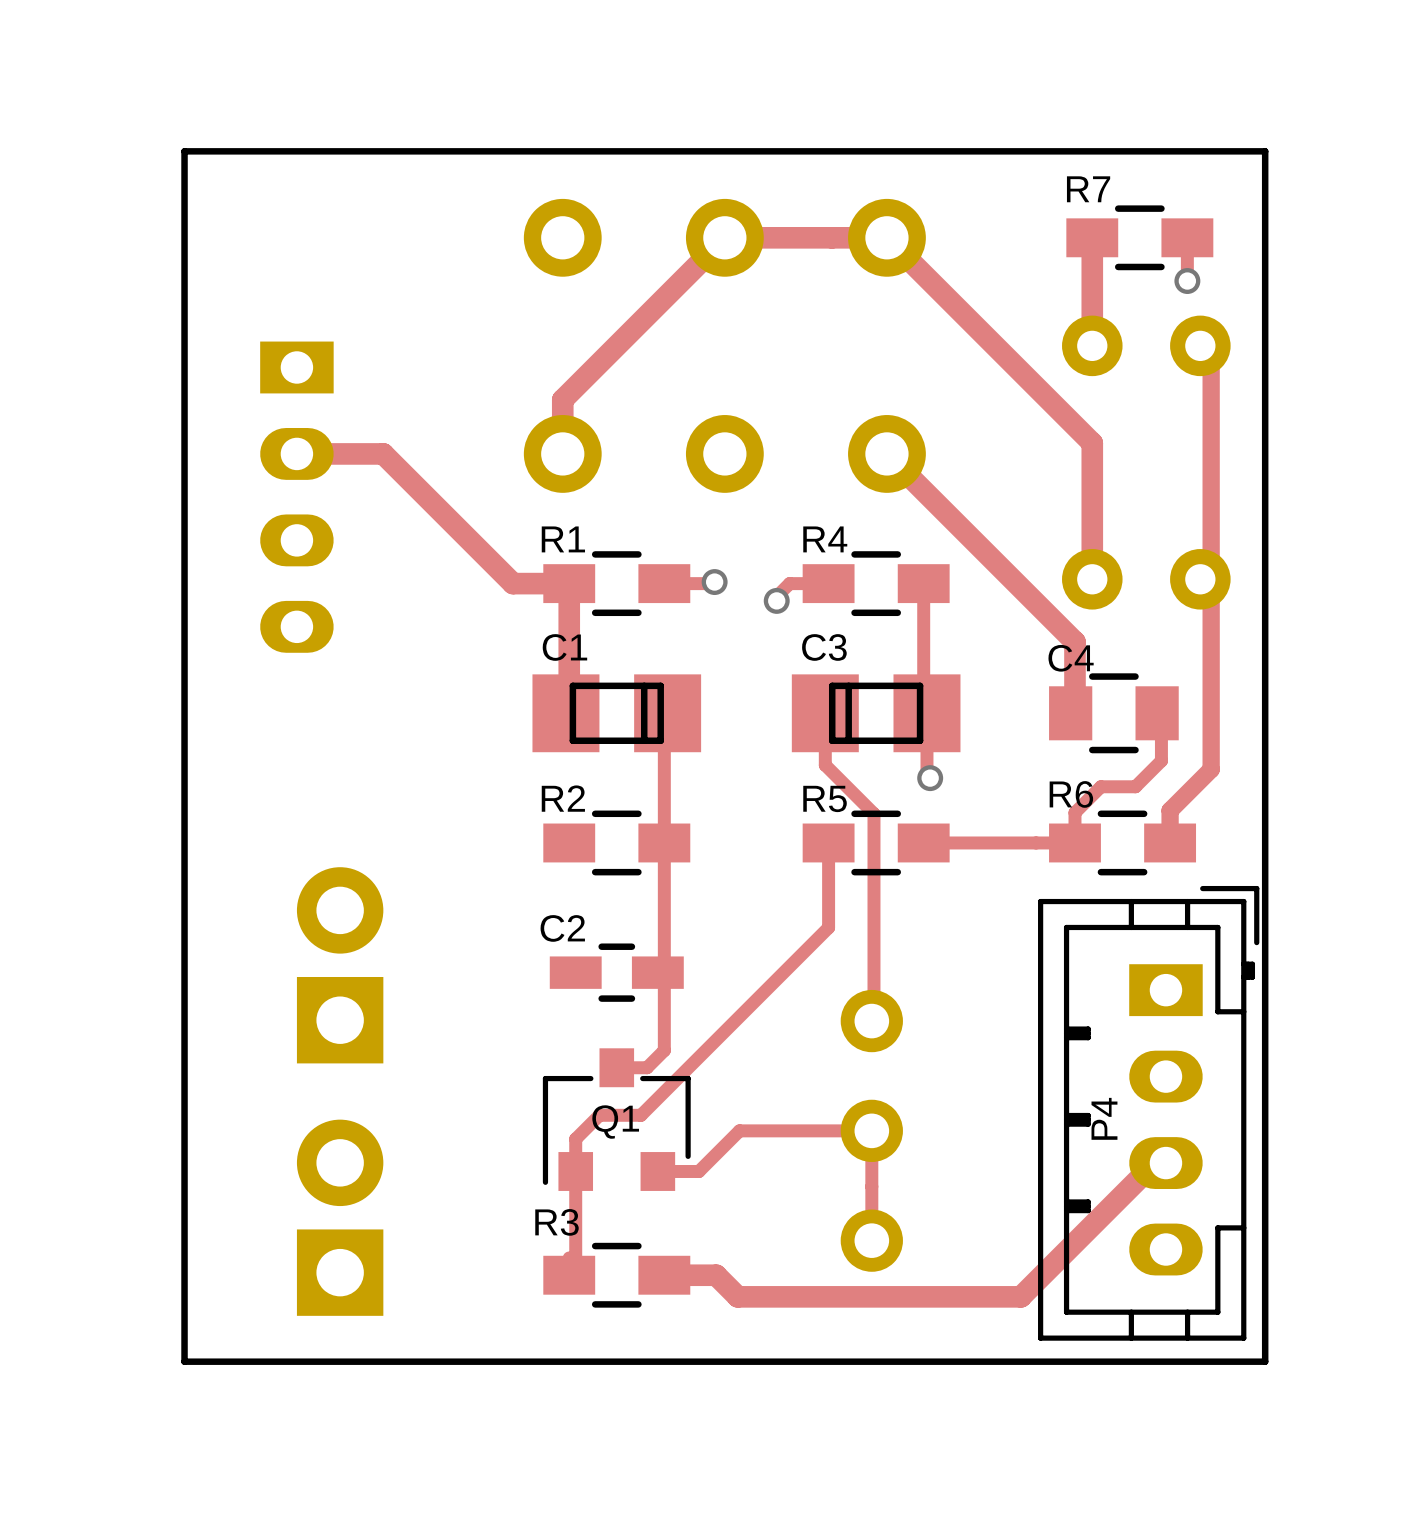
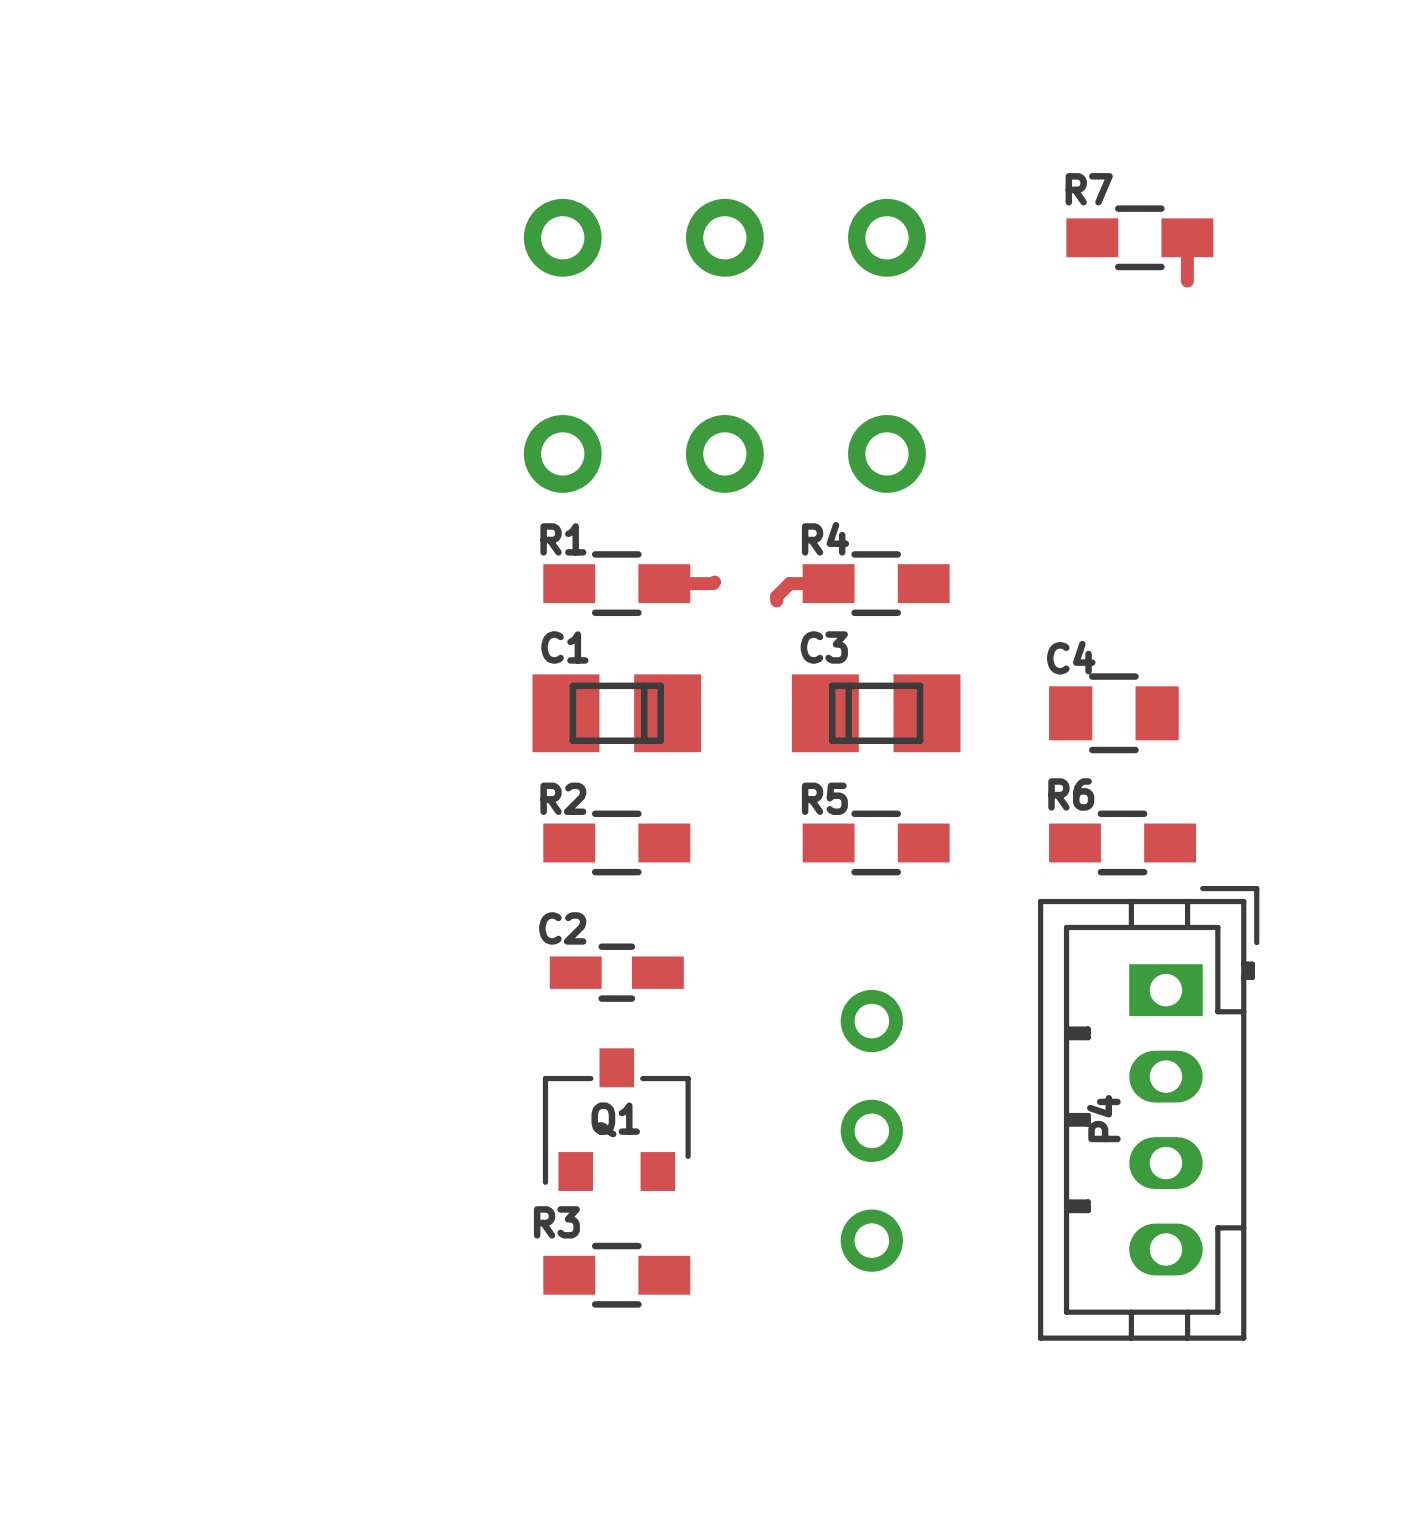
board edge: (184, 151) (184, 1361) (1265, 1361) (1265, 151) (184, 151) -> none
track: (1092, 237) (1092, 345) -> none
via: (1187, 281) -> none
part: (1146, 345) -> none
track: (1200, 345) (1211, 356) (1211, 568) (1204, 574) -> none
track: (296, 453) (383, 453) (513, 583) (569, 583) (569, 710) (565, 713) -> none
track: (562, 453) (562, 399) (724, 237) (886, 237) (1092, 443) (1092, 579) -> none
track: (886, 453) (1074, 641) (1074, 717) -> none
part: (296, 497) -> none
part: (1146, 579) -> none
via: (714, 582) -> none
track: (923, 583) (923, 710) (926, 713) (926, 774) (930, 778) -> none
track: (1204, 583) (1211, 590) (1211, 769) (1170, 810) (1170, 842) -> none
via: (776, 600) -> none
track: (667, 713) (664, 716) (664, 966) (657, 972) (664, 979) (664, 1050) (647, 1067) (616, 1067) -> none
track: (825, 713) (825, 765) (873, 813) (873, 1018) -> none
track: (1161, 717) (1161, 760) (1135, 786) (1100, 786) (1074, 812) (1074, 842) (1066, 834) -> none
via: (930, 778) -> none
track: (923, 842) (1081, 842) -> none
track: (819, 851) (828, 842) (828, 927) (640, 1115) (599, 1115) (575, 1139) (575, 1268) (569, 1275) (569, 1257) -> none
part: (340, 965) -> none
track: (1165, 1162) (1154, 1162) (1020, 1296) (737, 1296) (716, 1275) (664, 1275) -> none
track: (660, 1171) (657, 1169) (657, 1171) (698, 1171) (739, 1130) (871, 1130) (871, 1240) -> none
part: (340, 1217) -> none

